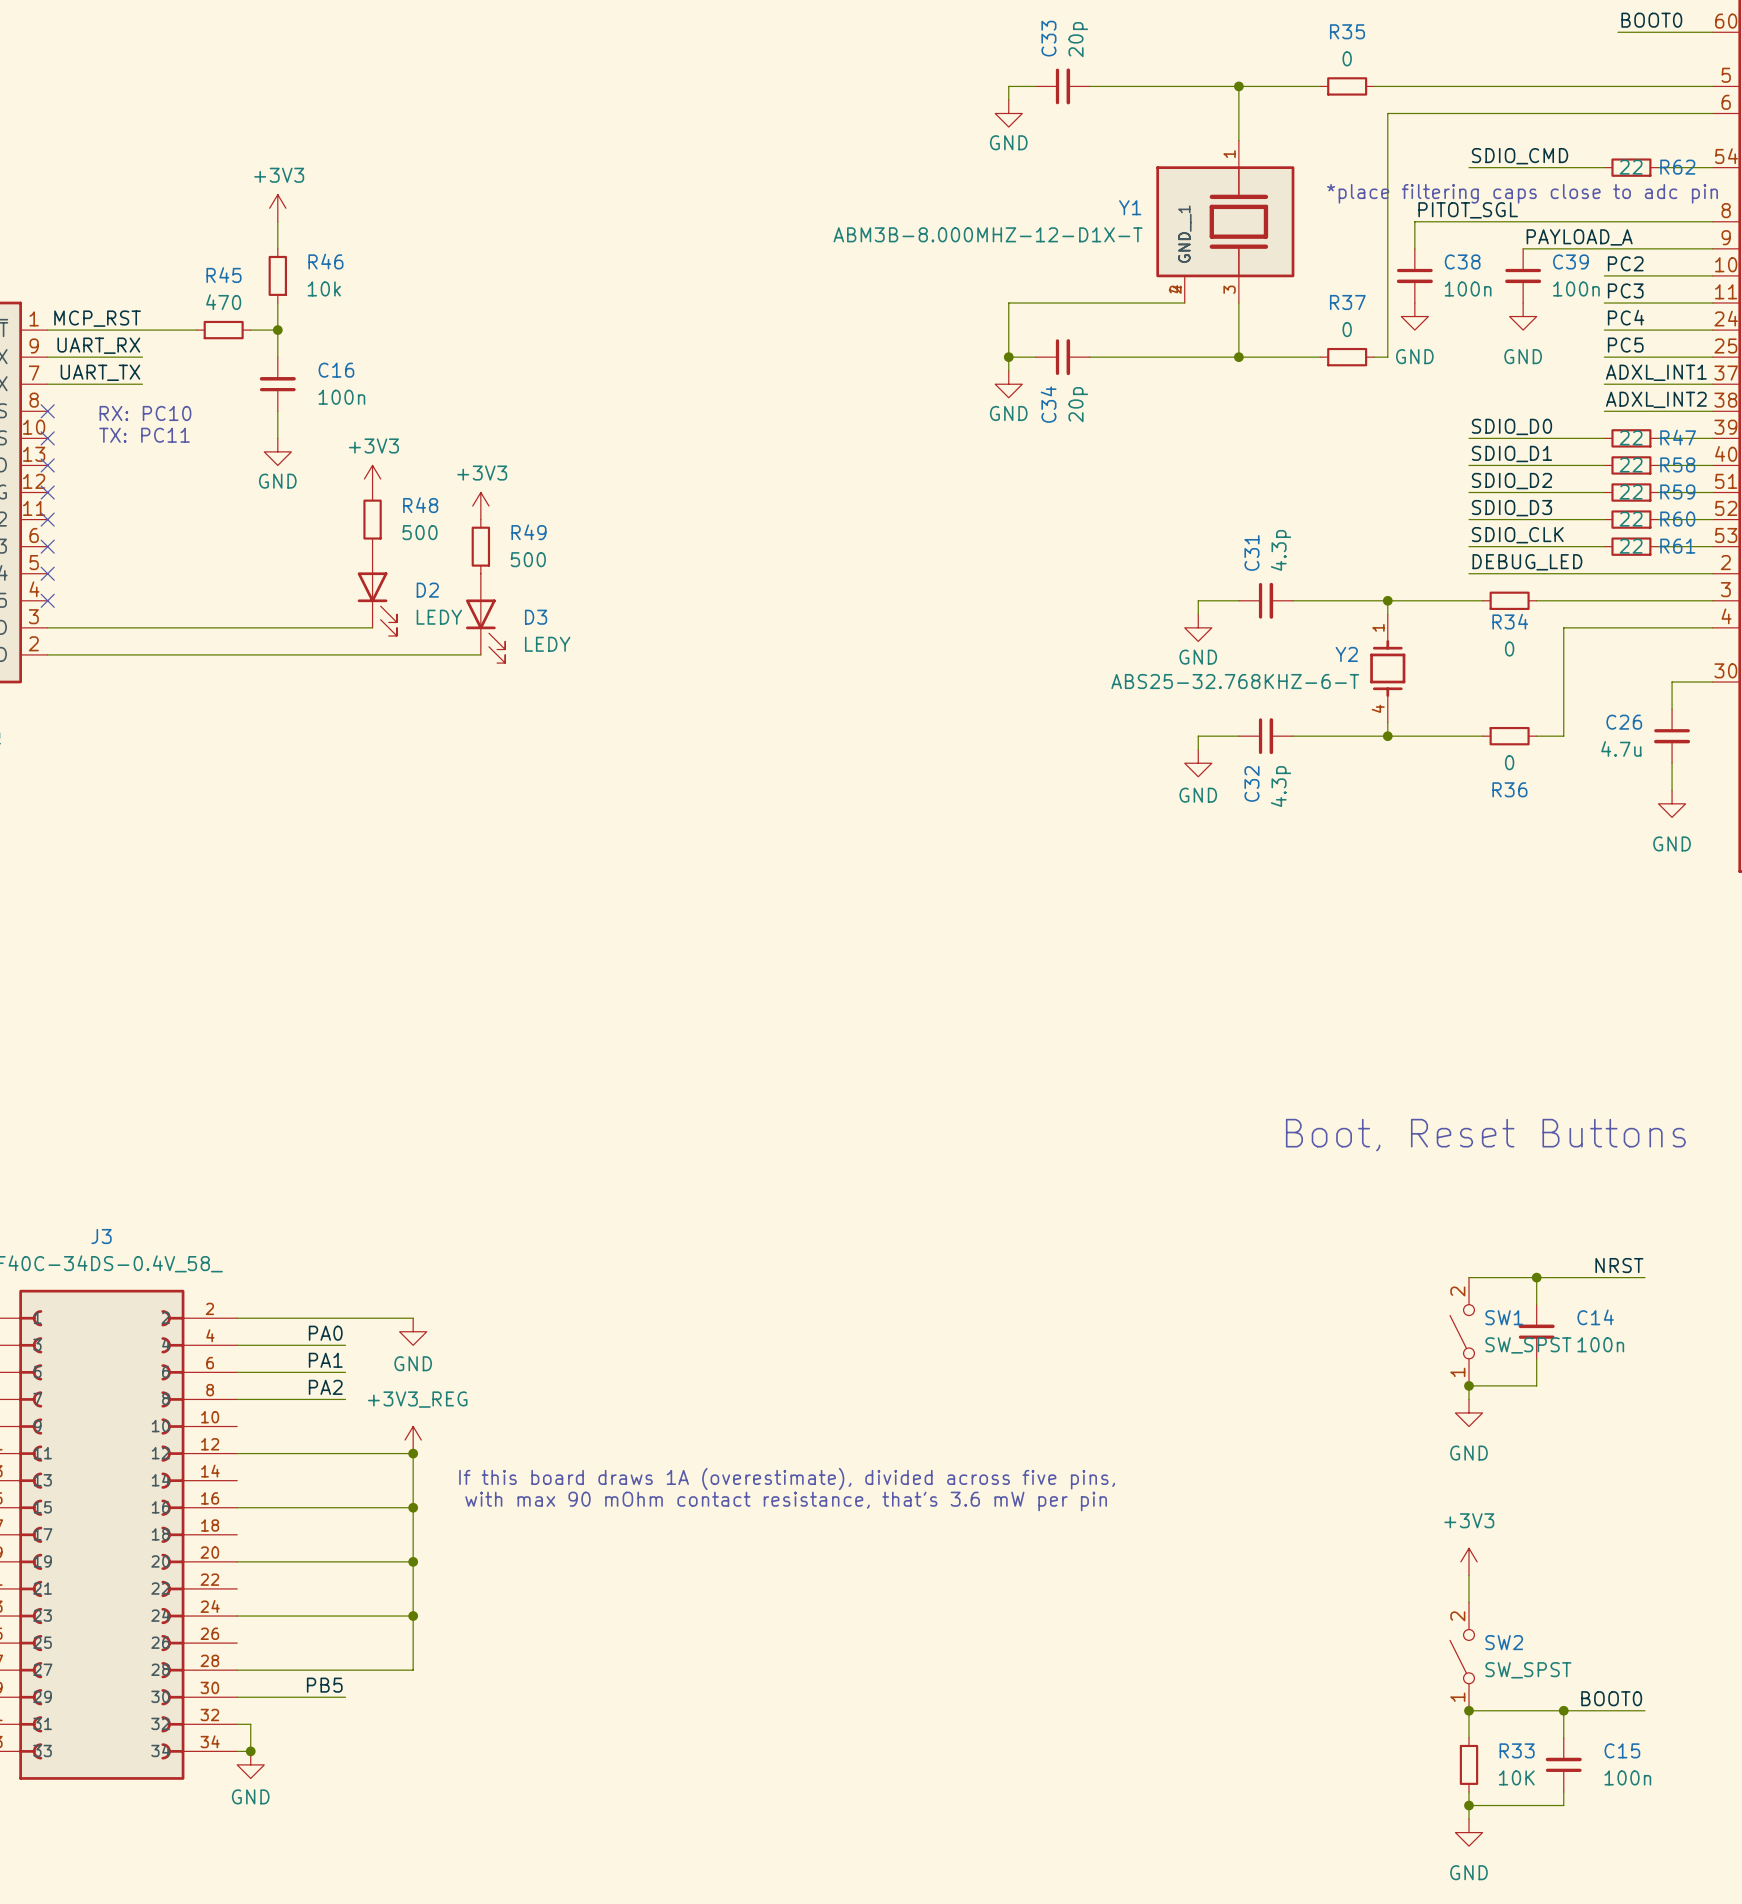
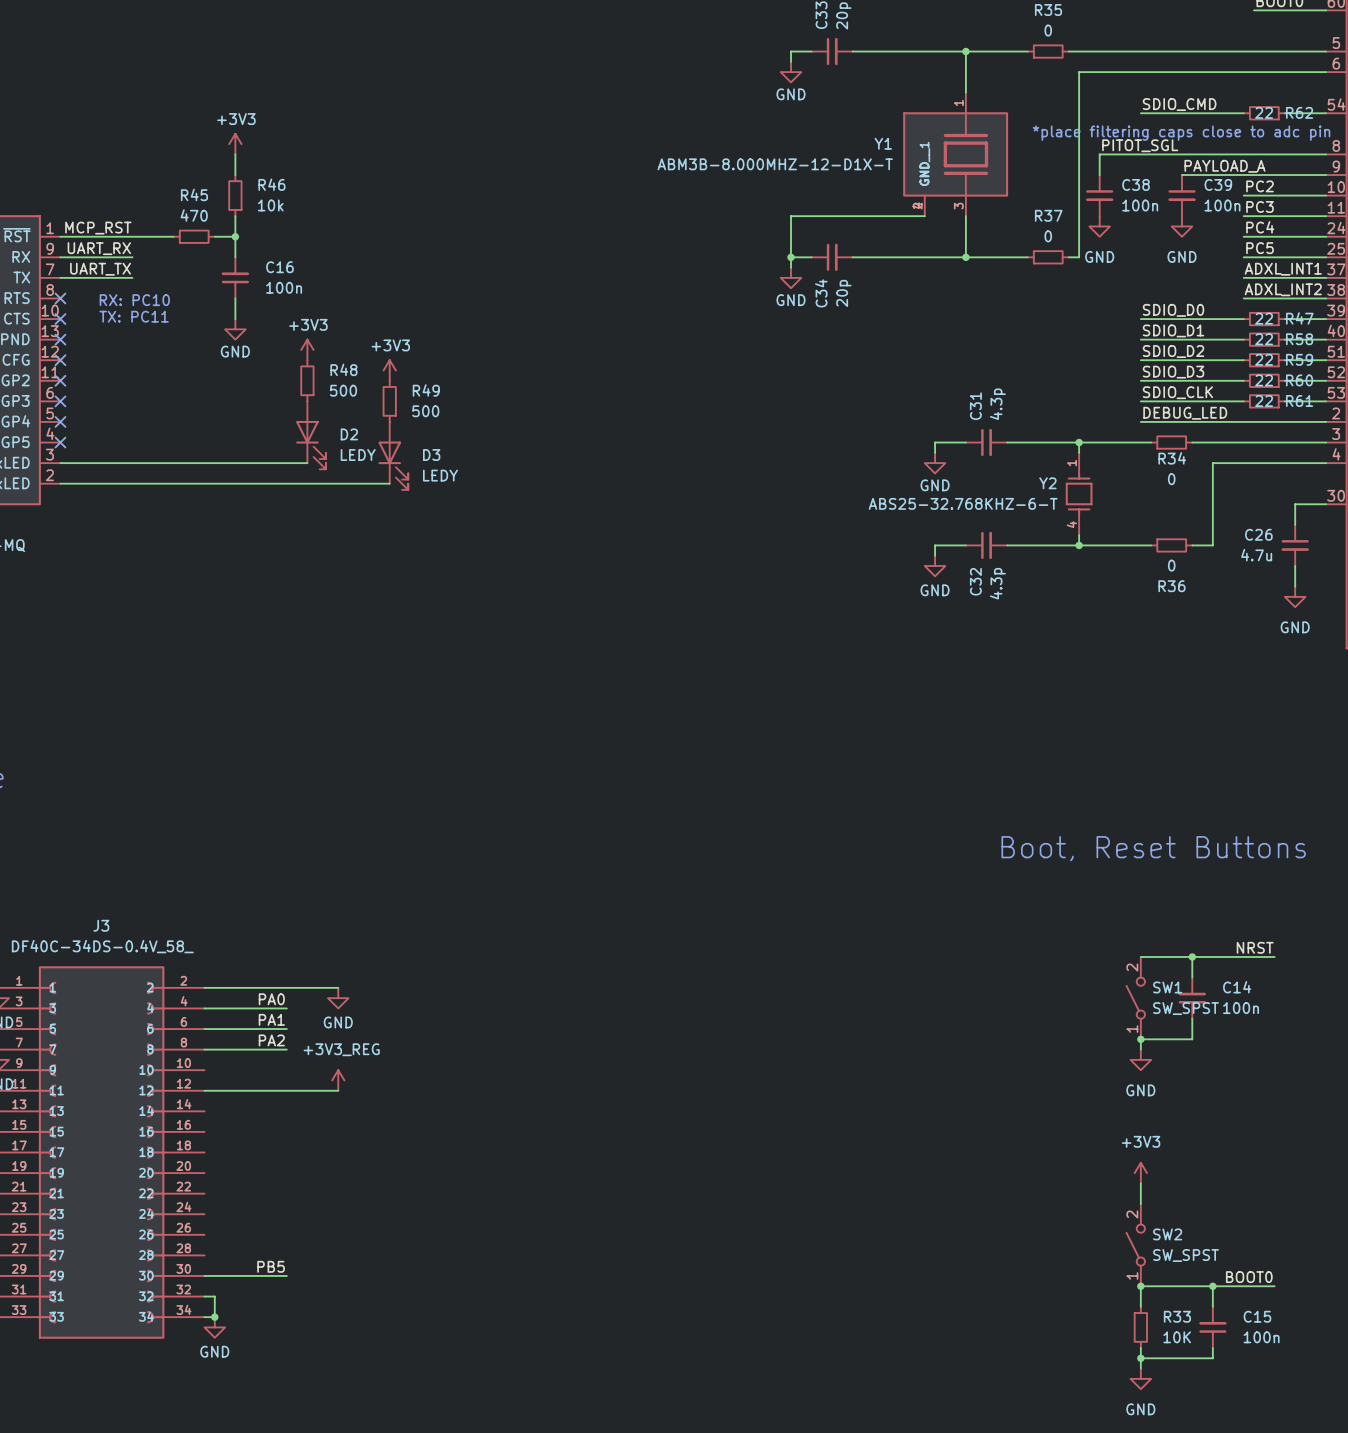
wire: (413, 1453) (413, 1670) (237, 1670) -> none
junction: (413, 1453) -> none
text: If this board draws 1A (overestimate), divided across five pins, (787, 1479) -> none
text: with max 90 mOhm contact resistance, that's 3.6 mW per pin (786, 1501) -> none
wire: (237, 1507) (413, 1507) -> none
junction: (413, 1507) -> none
wire: (237, 1561) (413, 1561) -> none
junction: (413, 1561) -> none
wire: (237, 1616) (413, 1616) -> none
junction: (413, 1616) -> none

